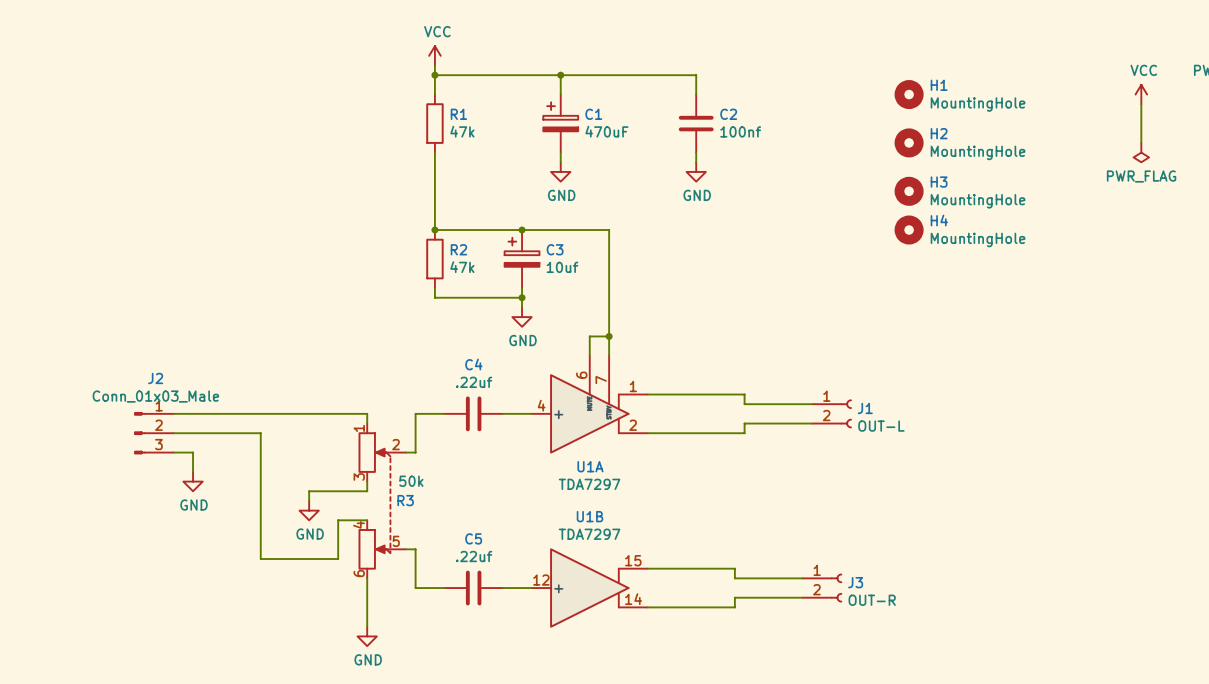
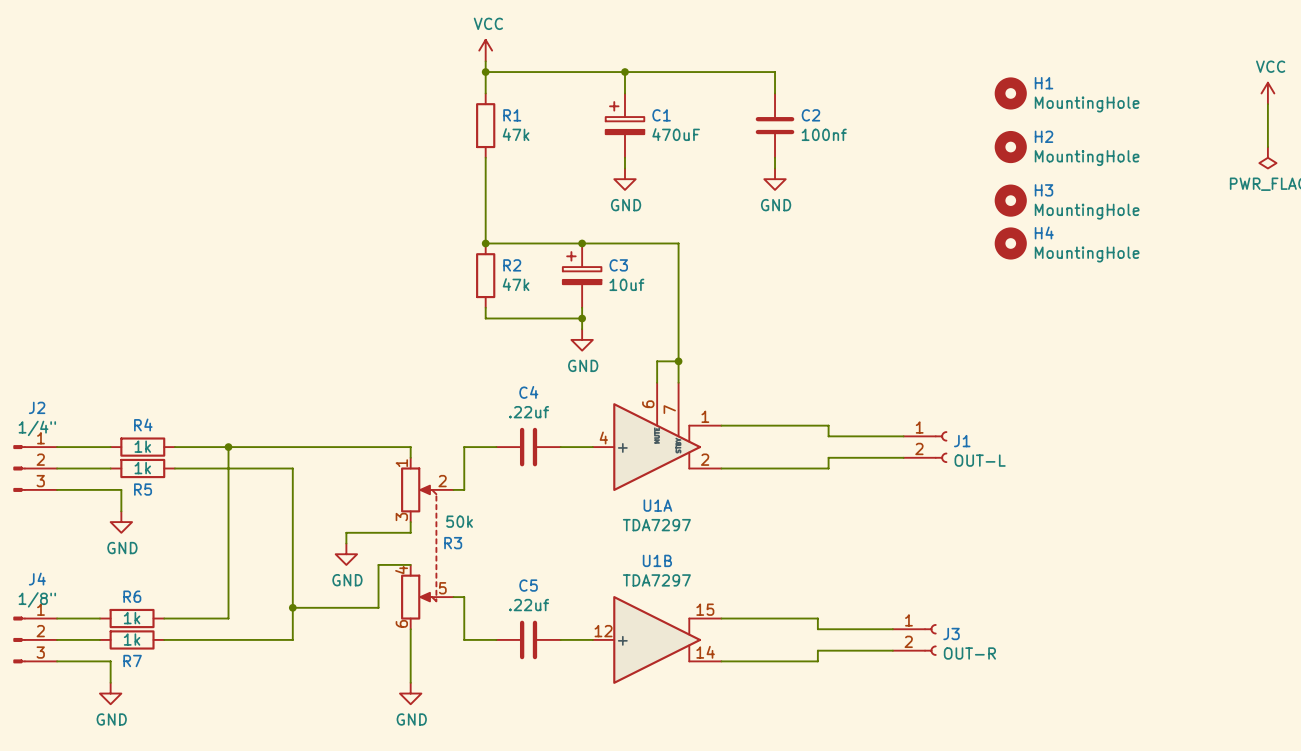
J2 value: Conn_01x03_Male (155, 396) -> 1/4" (37, 428)
wire: none -> (57, 447) (110, 447)
R4: none -> 1k (142, 447)
wire: none -> (228, 447) (228, 618) (164, 618)
junction: none -> (228, 447)
wire: none -> (57, 468) (110, 468)
R5: none -> 1k (142, 468)
J2 position: (154, 433) -> (35, 468)
wire: none -> (57, 489) (121, 489) (121, 511)
wire: (173, 452) (193, 452) (193, 471) -> none
power symbol position: GND (193, 481) -> GND (121, 522)
wire: none -> (292, 607) (292, 639) (164, 639)
junction: none -> (292, 607)
wire: none -> (57, 618) (99, 618)
R6: none -> 1k (132, 618)
J4: none -> 1/8" (35, 639)
wire: none -> (57, 639) (99, 639)
R7: none -> 1k (132, 639)
wire: none -> (57, 661) (110, 661) (110, 682)
power symbol: none -> GND (110, 693)

